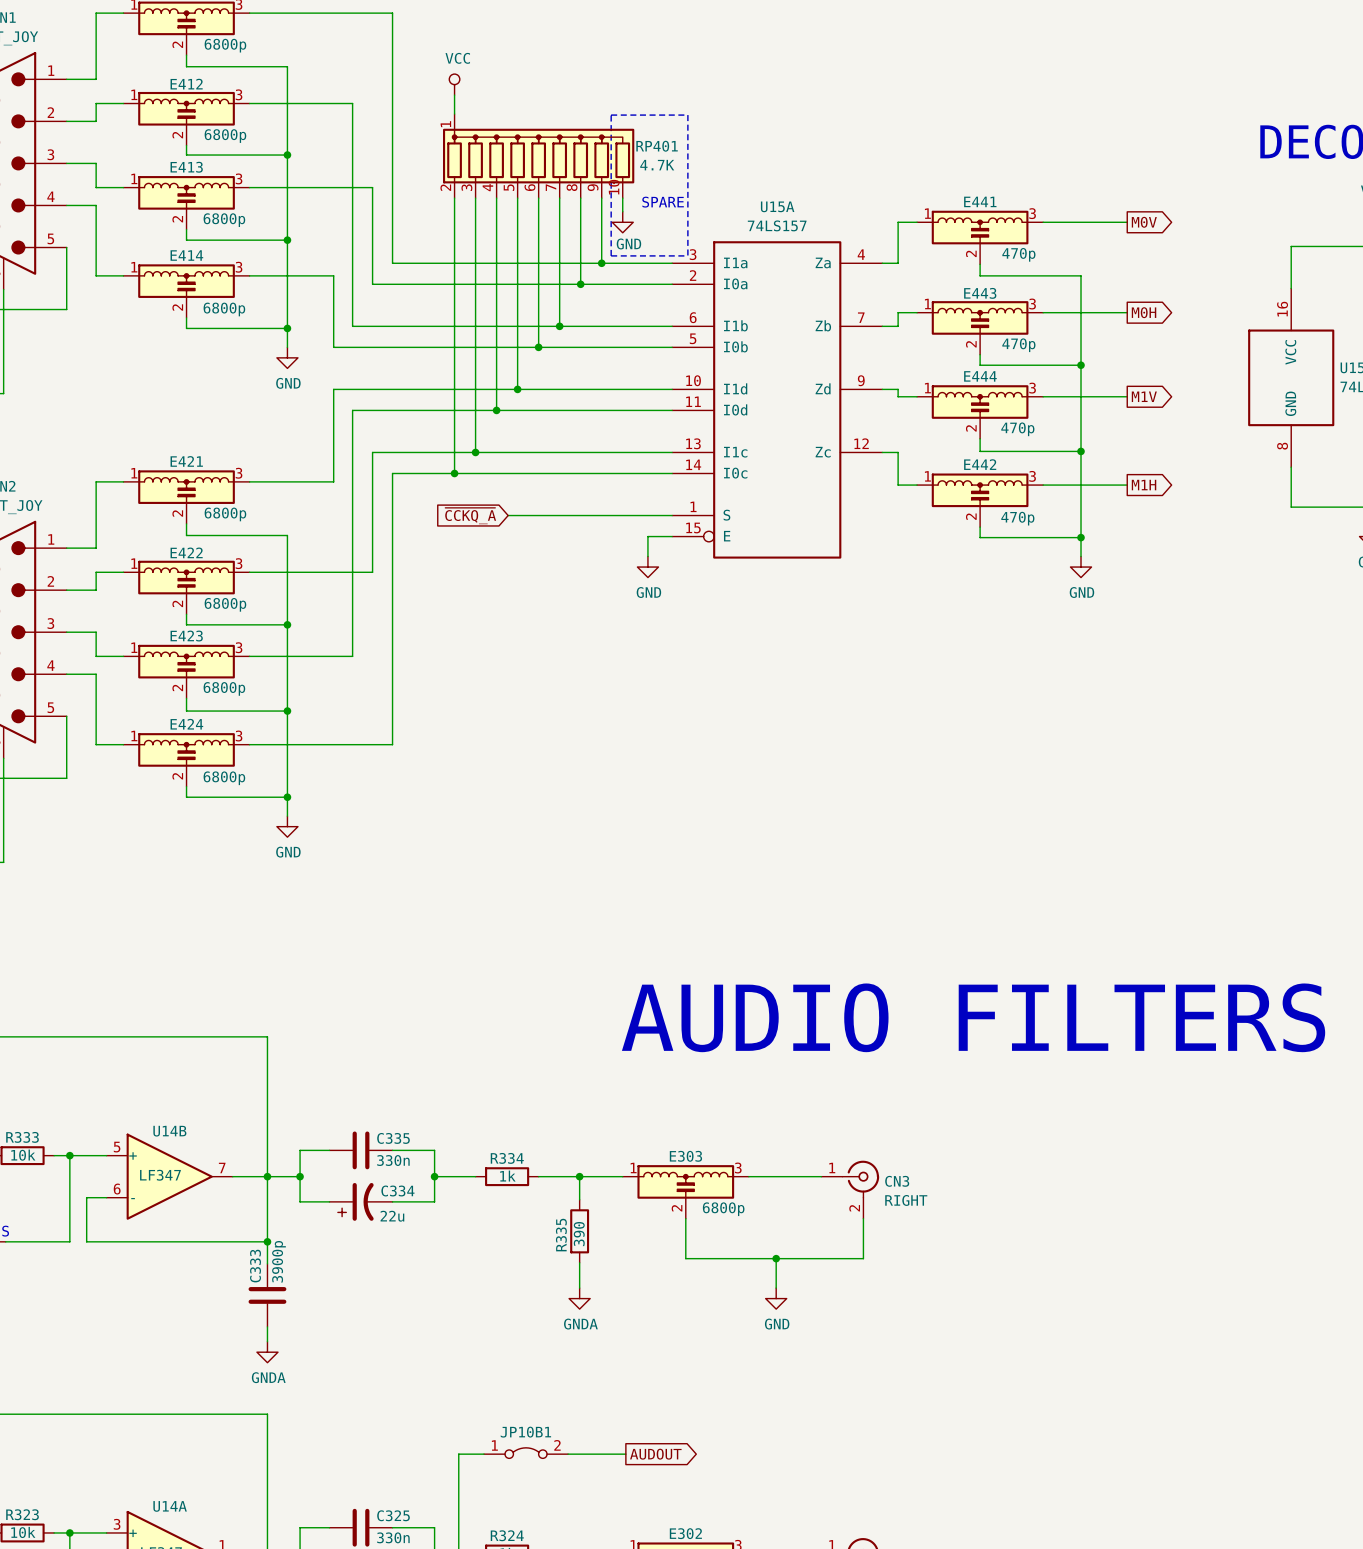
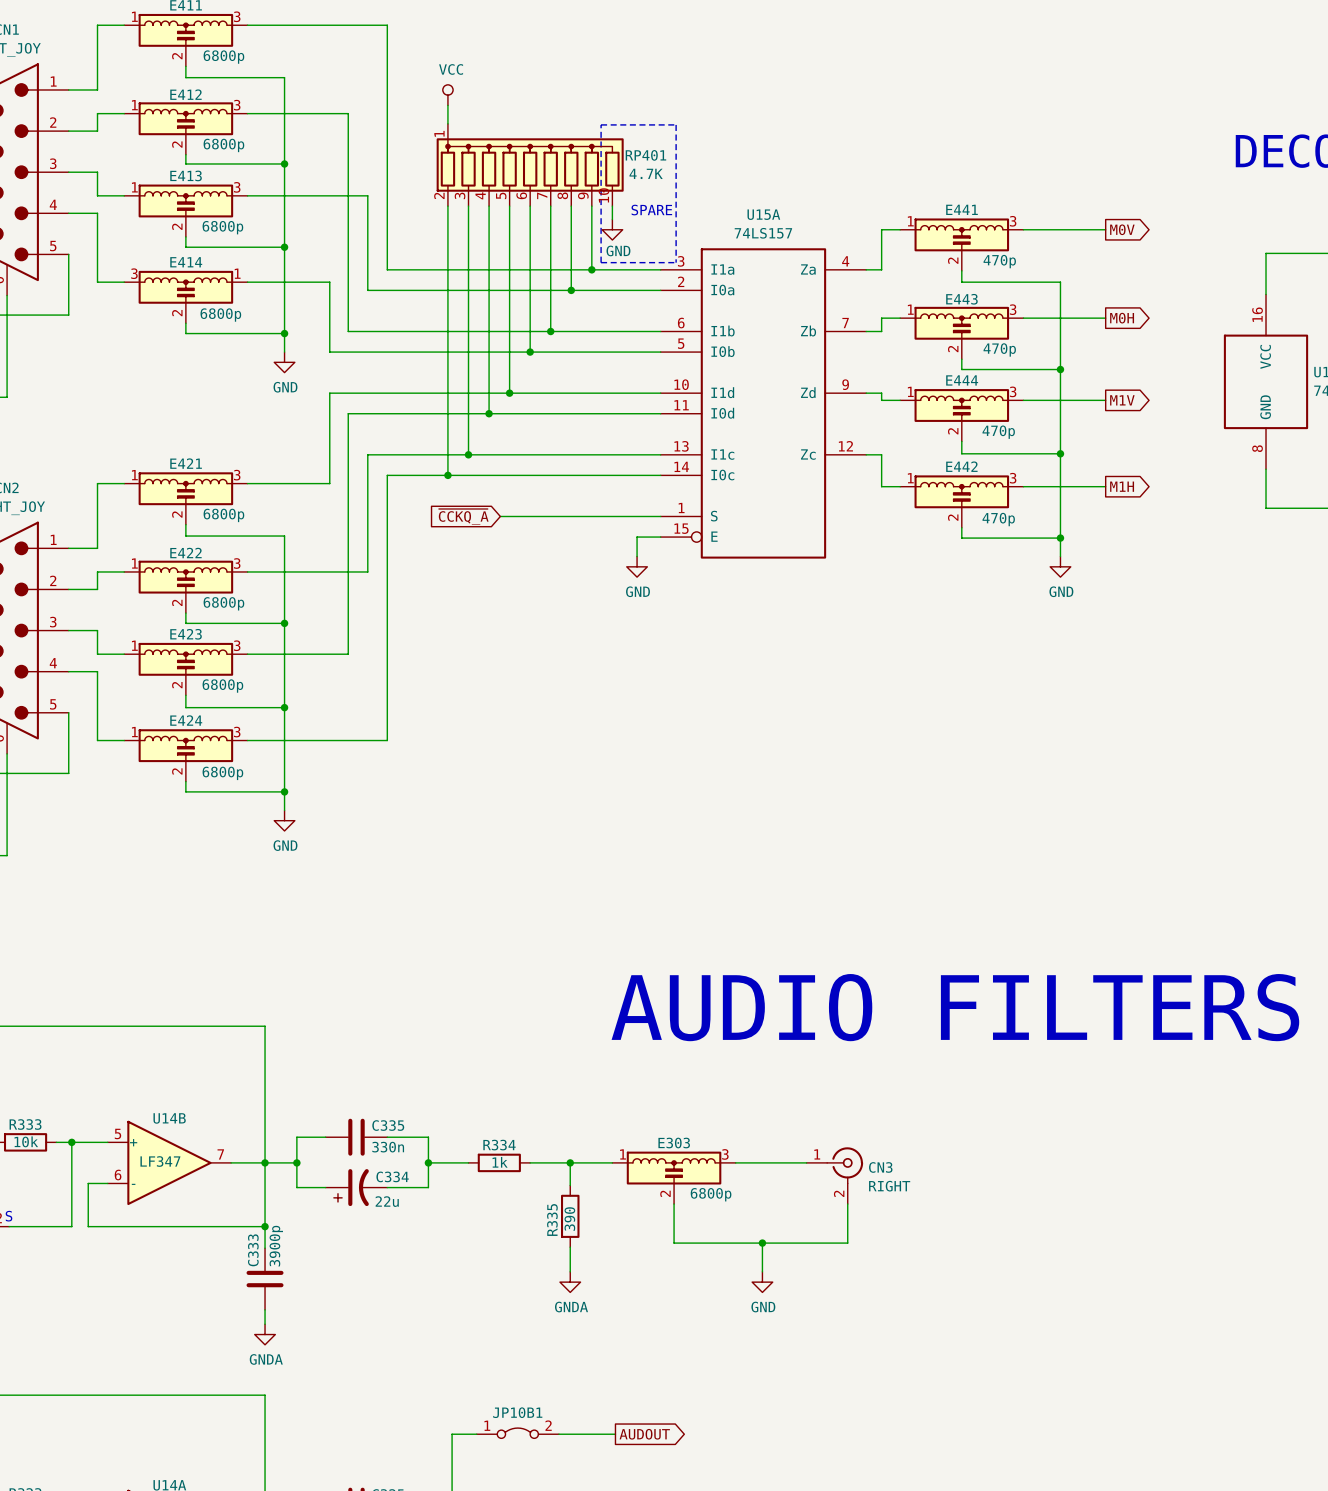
E414 flip: as is (186, 281) -> left-right (185, 287)

